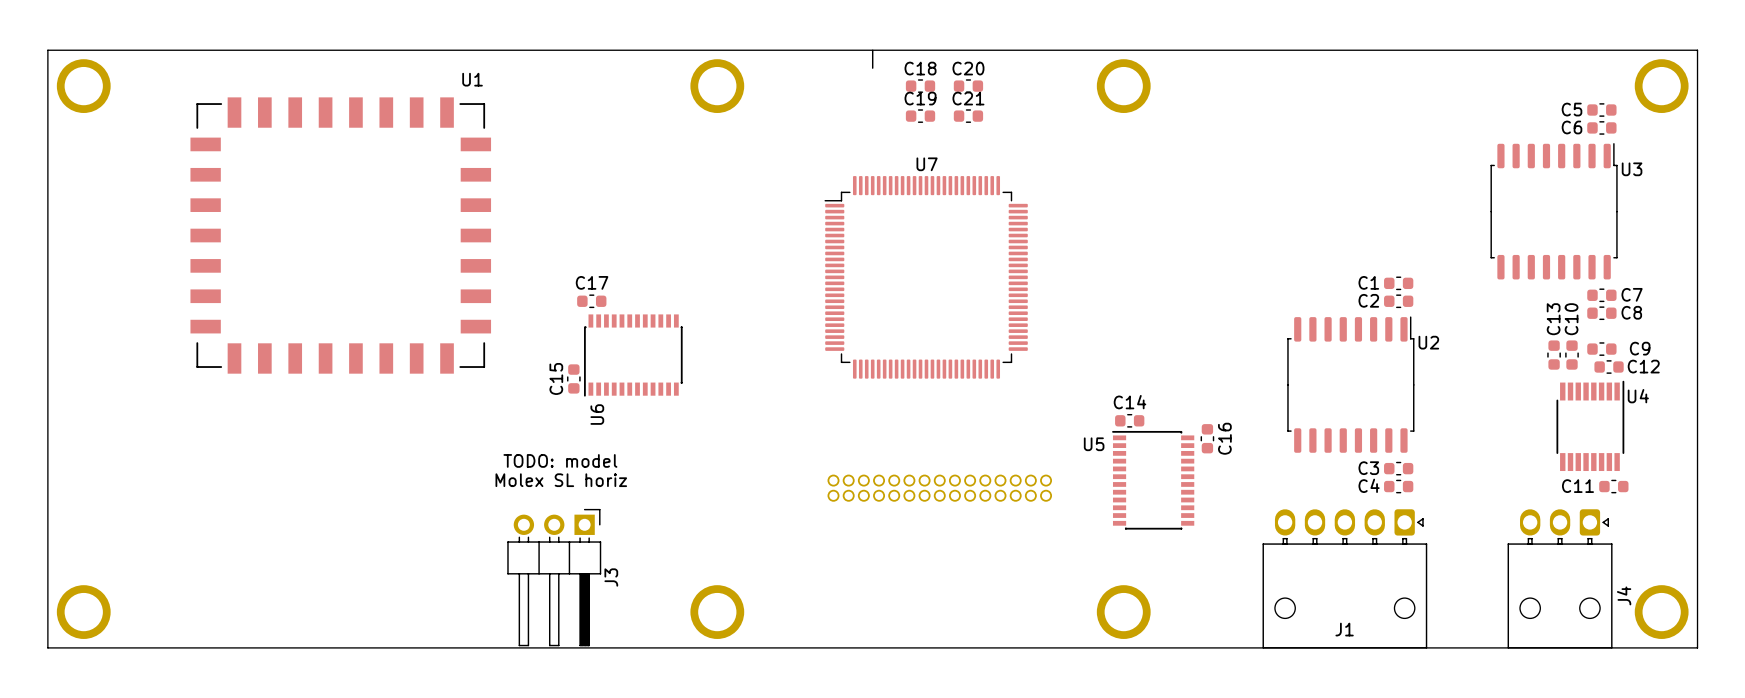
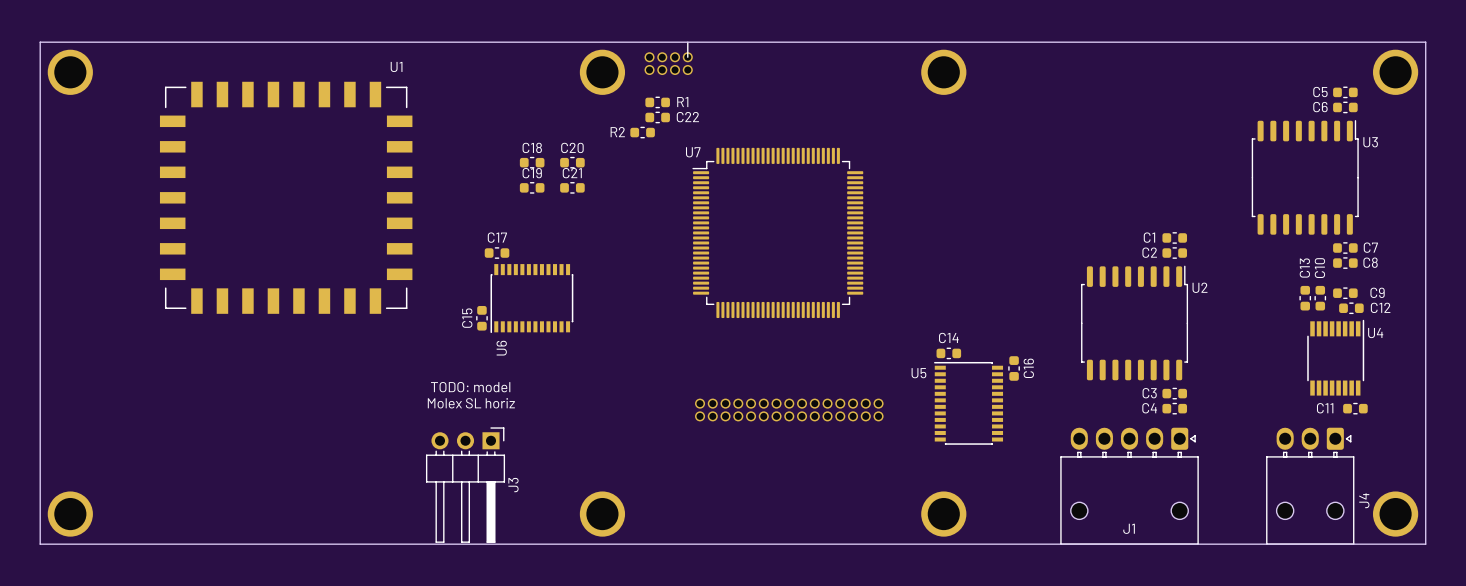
line: (872, 50) (872, 68) -> (687, 42) (687, 57)
part: none -> (668, 63)
C18 position: (920, 86) -> (532, 162)
C20 position: (968, 86) -> (572, 162)
C19 position: (920, 116) -> (532, 187)
C21 position: (968, 116) -> (572, 187)
R1: none -> (657, 102)
C22: none -> (657, 117)
R2: none -> (642, 132)
U7 name position: U7 (927, 164) -> U7 (693, 152)

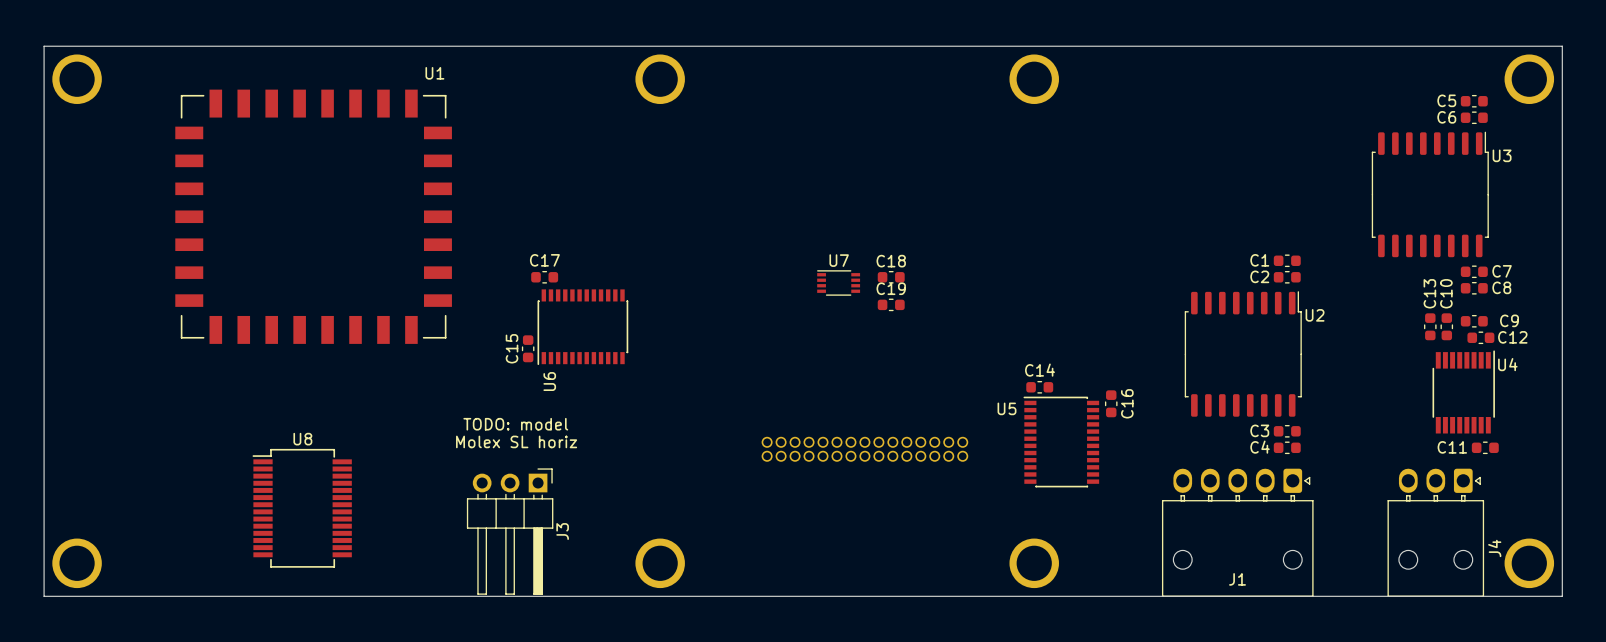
line: (687, 42) (687, 57) -> none
part: (668, 63) -> none
R1: (657, 102) -> none
C22: (657, 117) -> none
R2: (642, 132) -> none
U7 footprint: [692, 147, 864, 319] -> [817, 270, 861, 296]
U7 name position: U7 (693, 152) -> U7 (839, 260)
C18 position: (532, 162) -> (891, 277)
C20: (572, 162) -> none
C19 position: (532, 187) -> (891, 304)
C21: (572, 187) -> none
U8: none -> (302, 508)

